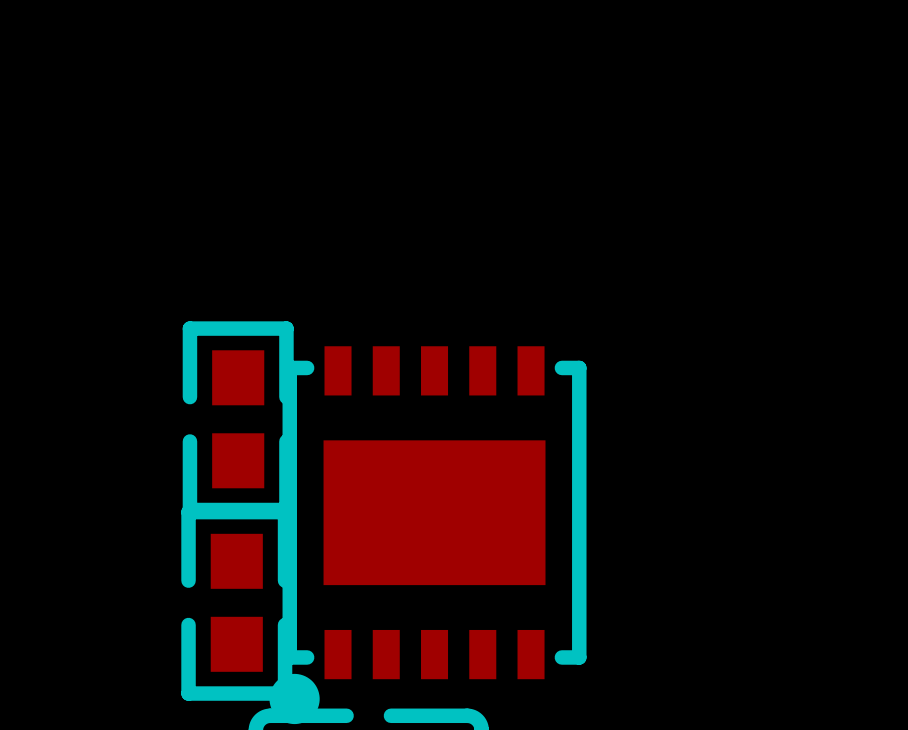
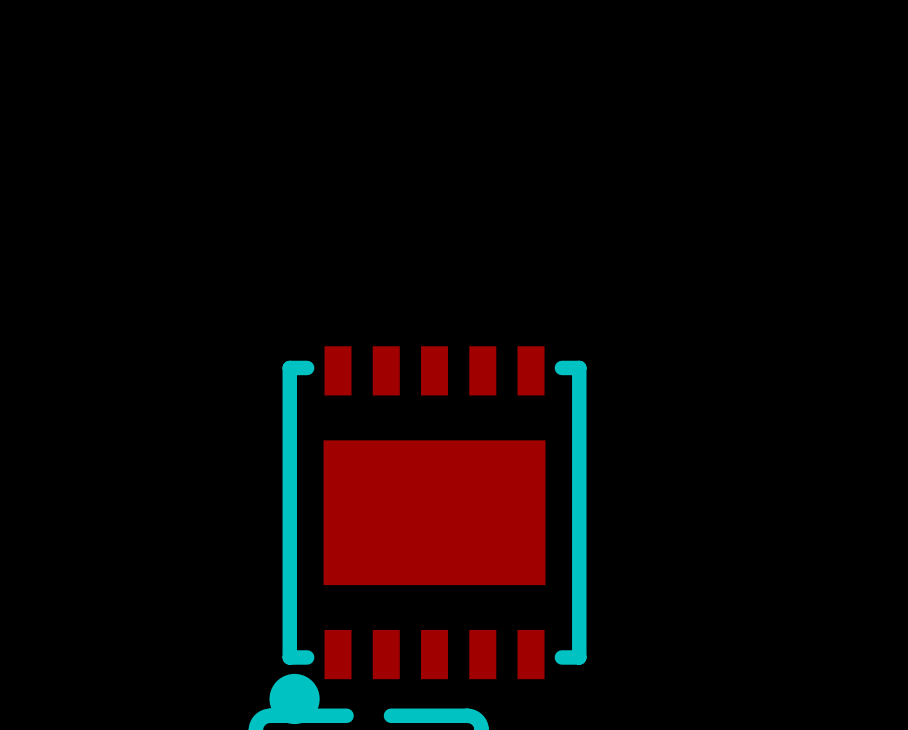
part: (238, 419) -> none
part: (236, 602) -> none

